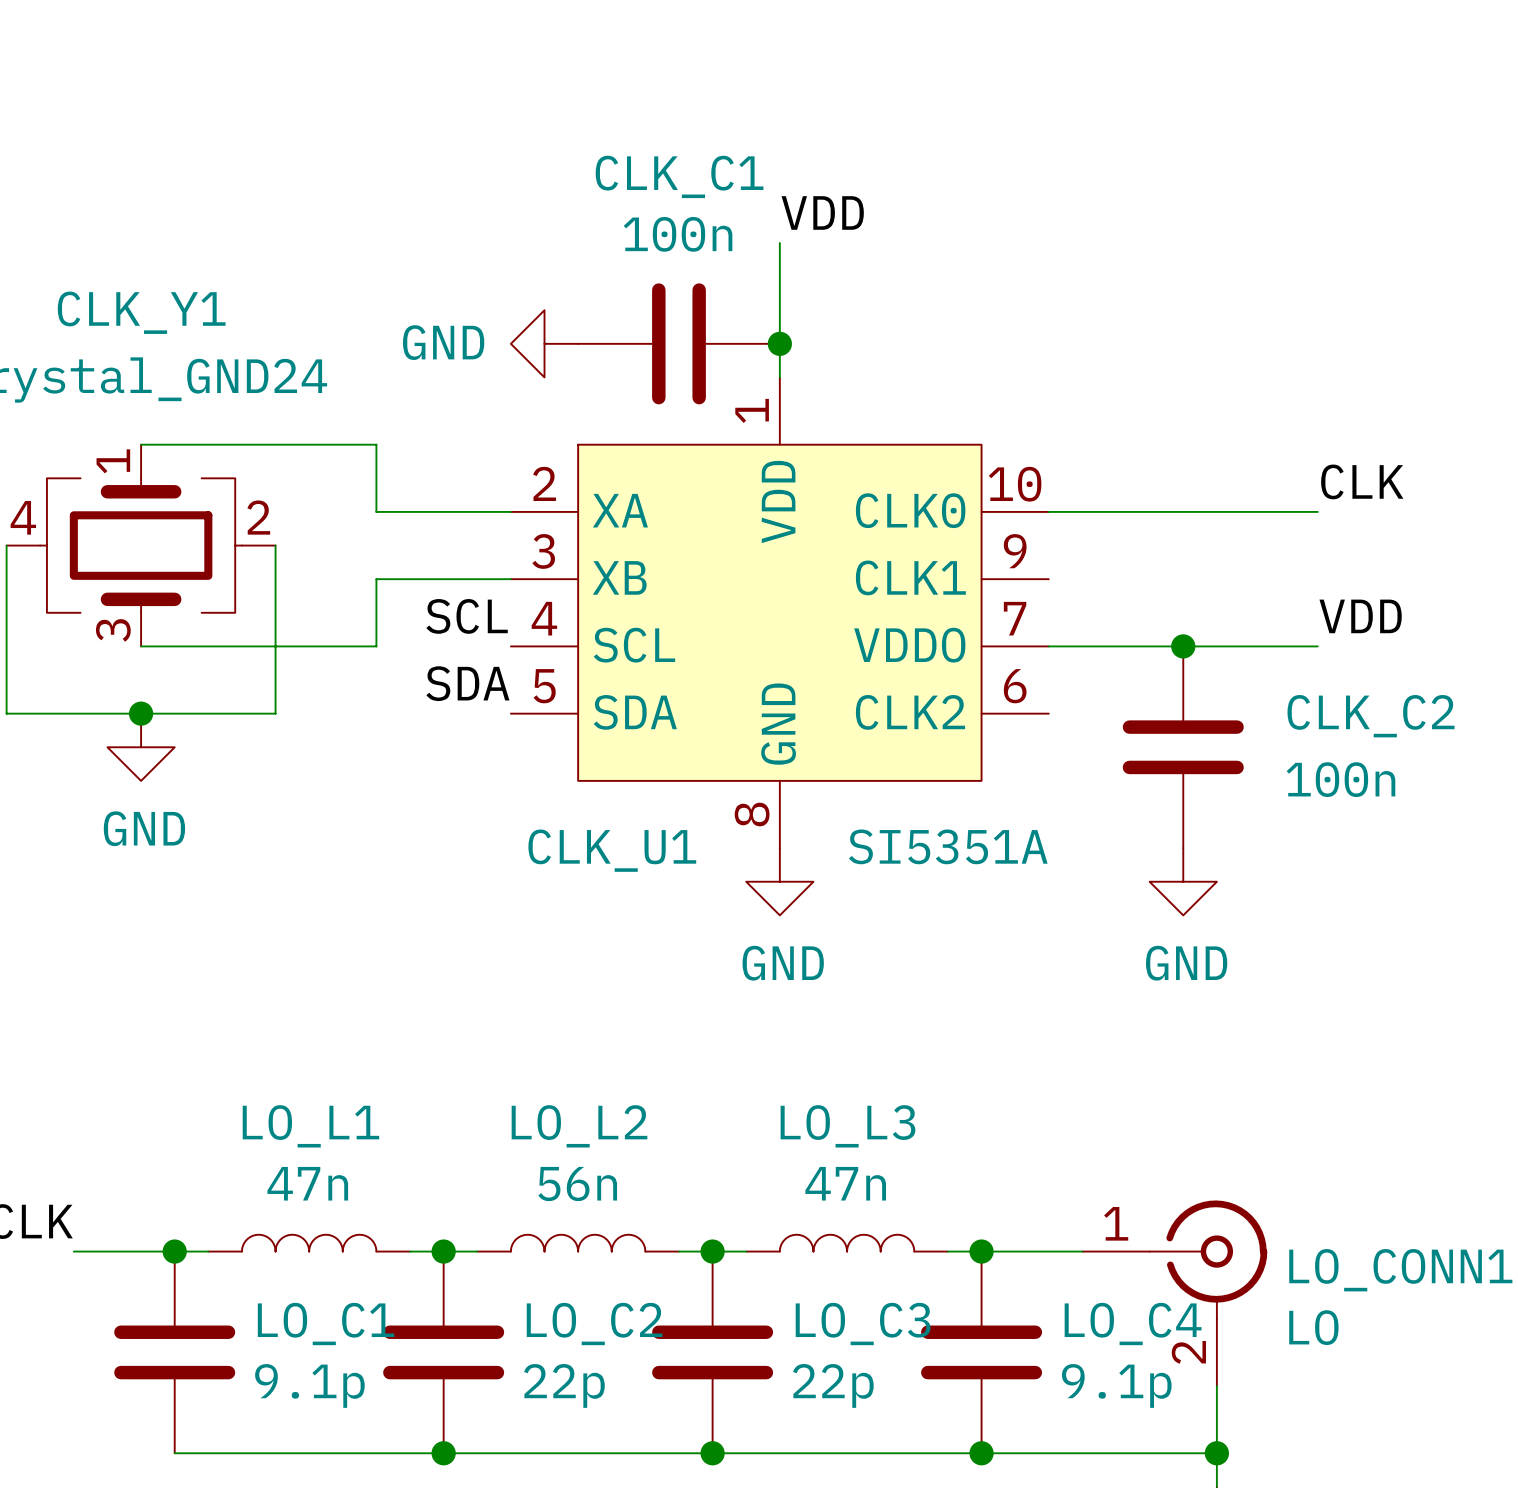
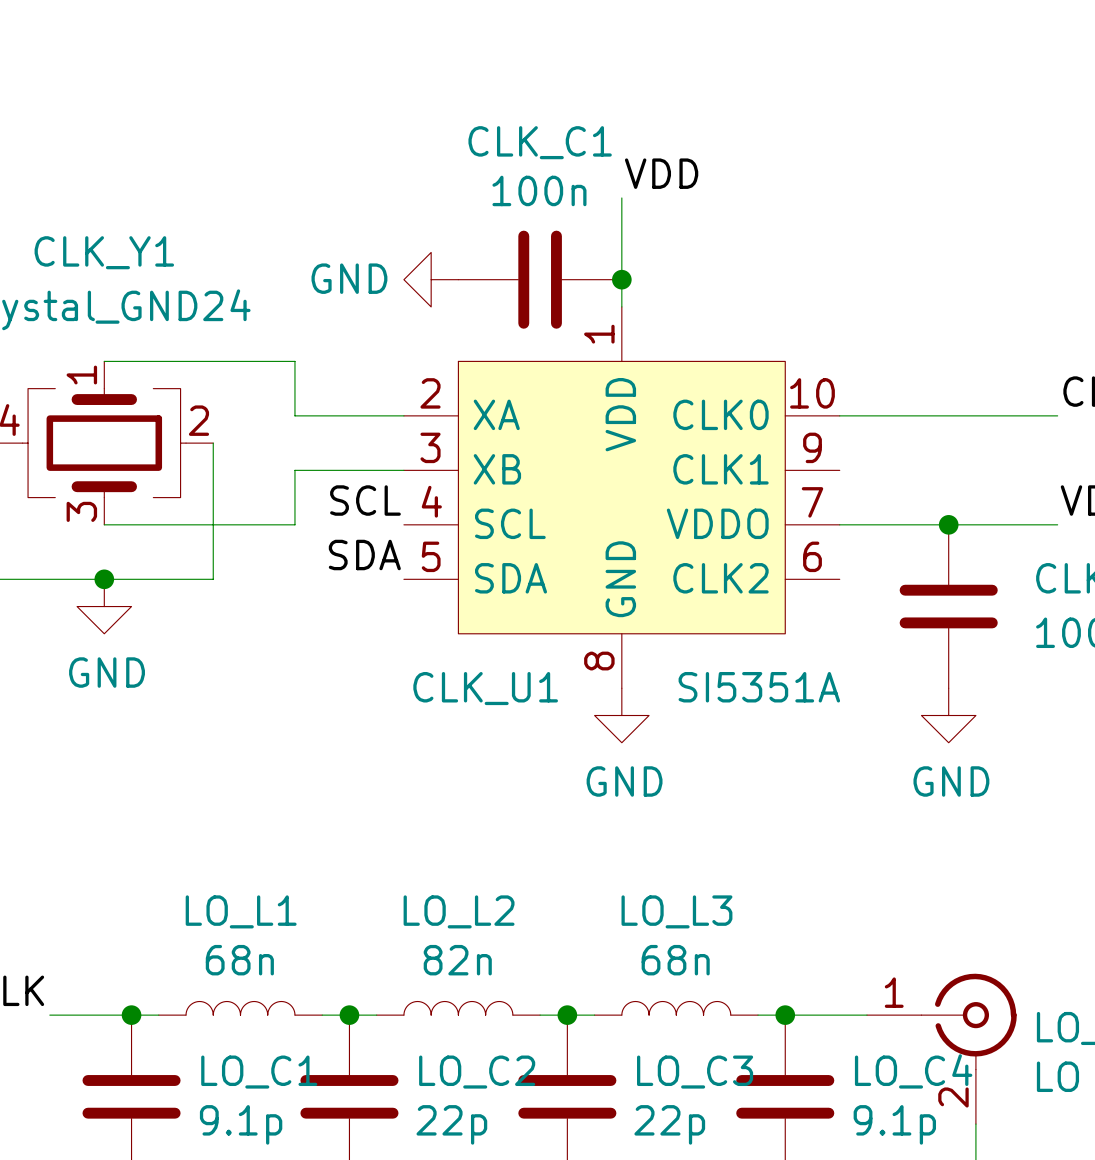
LO_L1 value: 47n (307, 1183) -> 68n (239, 960)
LO_L3 value: 47n (845, 1183) -> 68n (675, 960)
LO_L2 value: 56n (577, 1184) -> 82n (457, 960)

